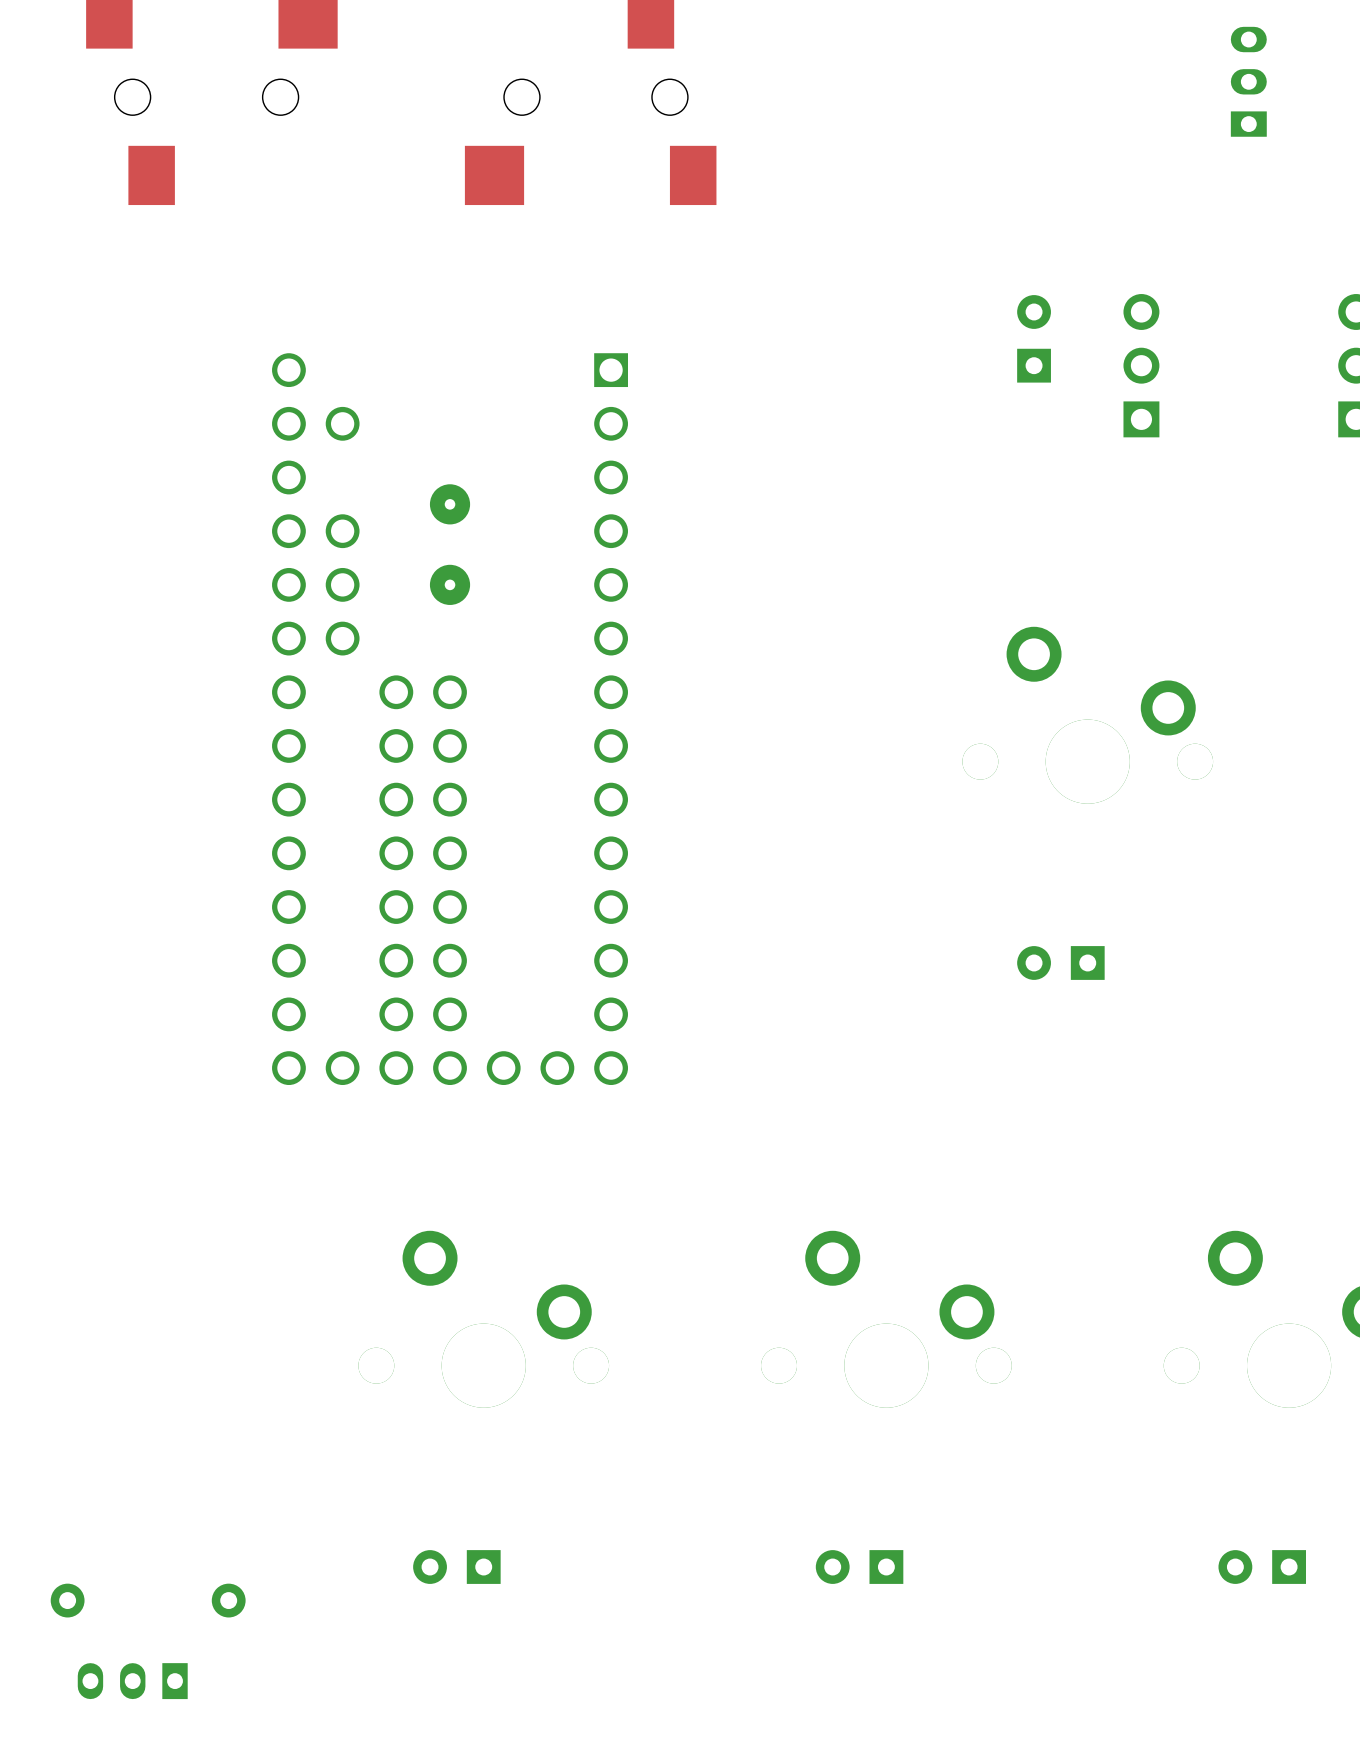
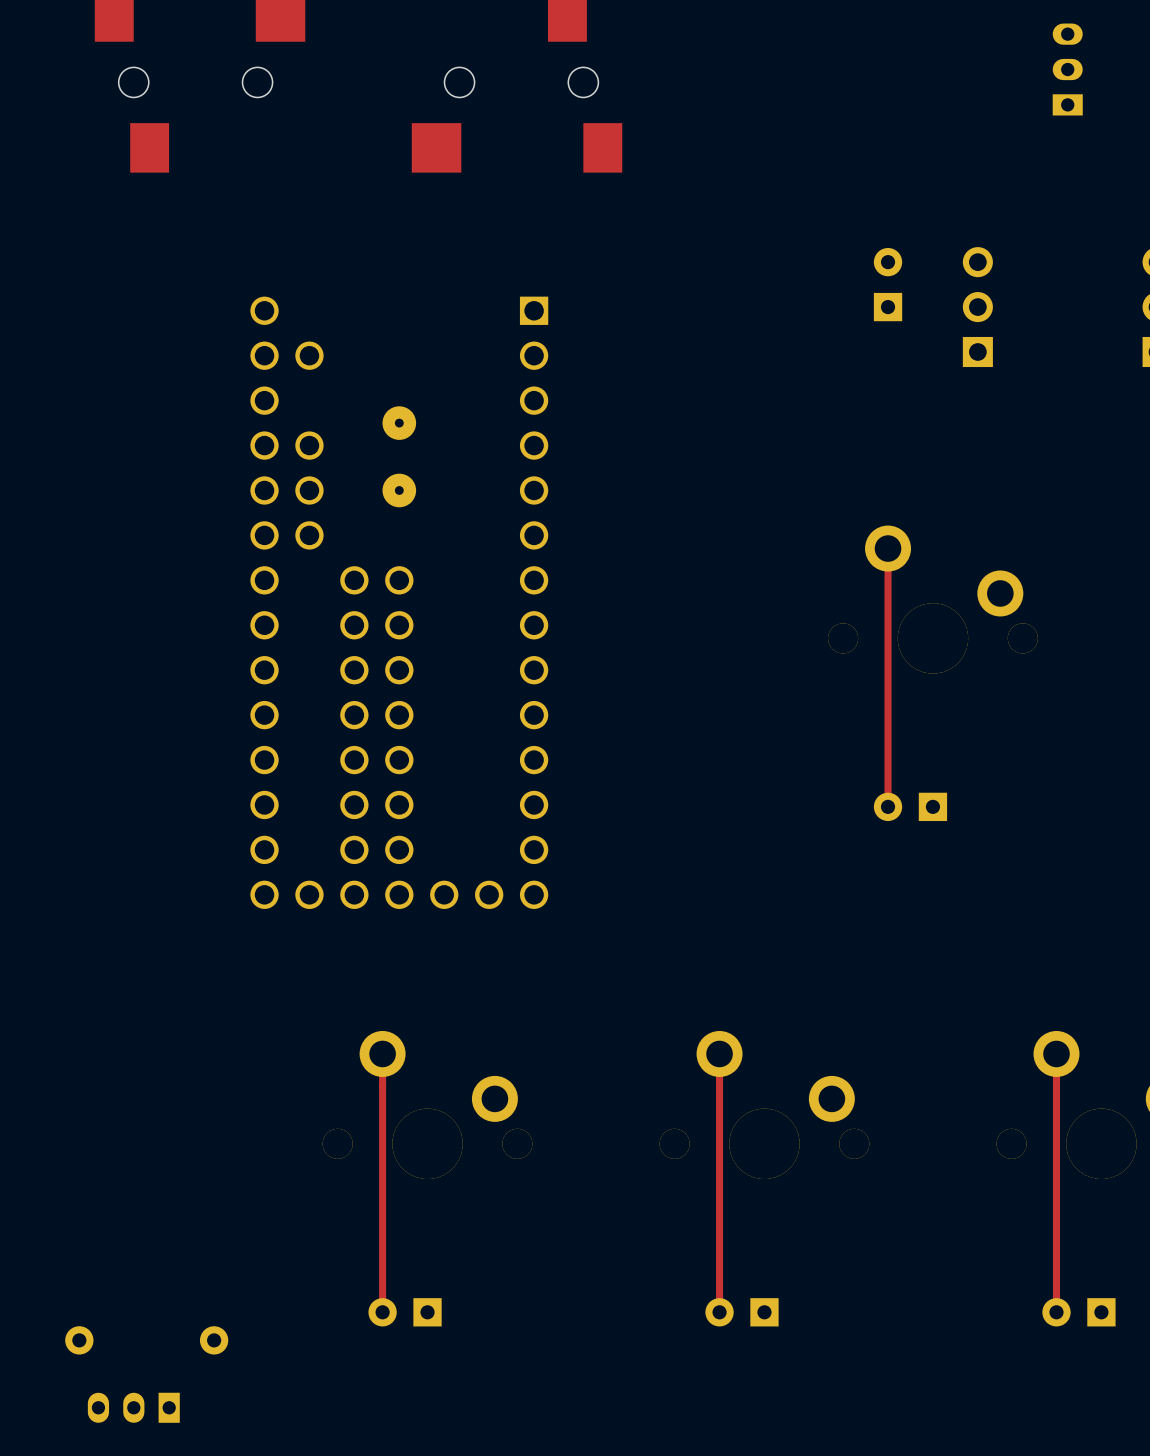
top track: none -> (888, 548) (888, 806)
top track: none -> (382, 1053) (382, 1312)
top track: none -> (719, 1053) (719, 1312)
top track: none -> (1056, 1053) (1056, 1312)

